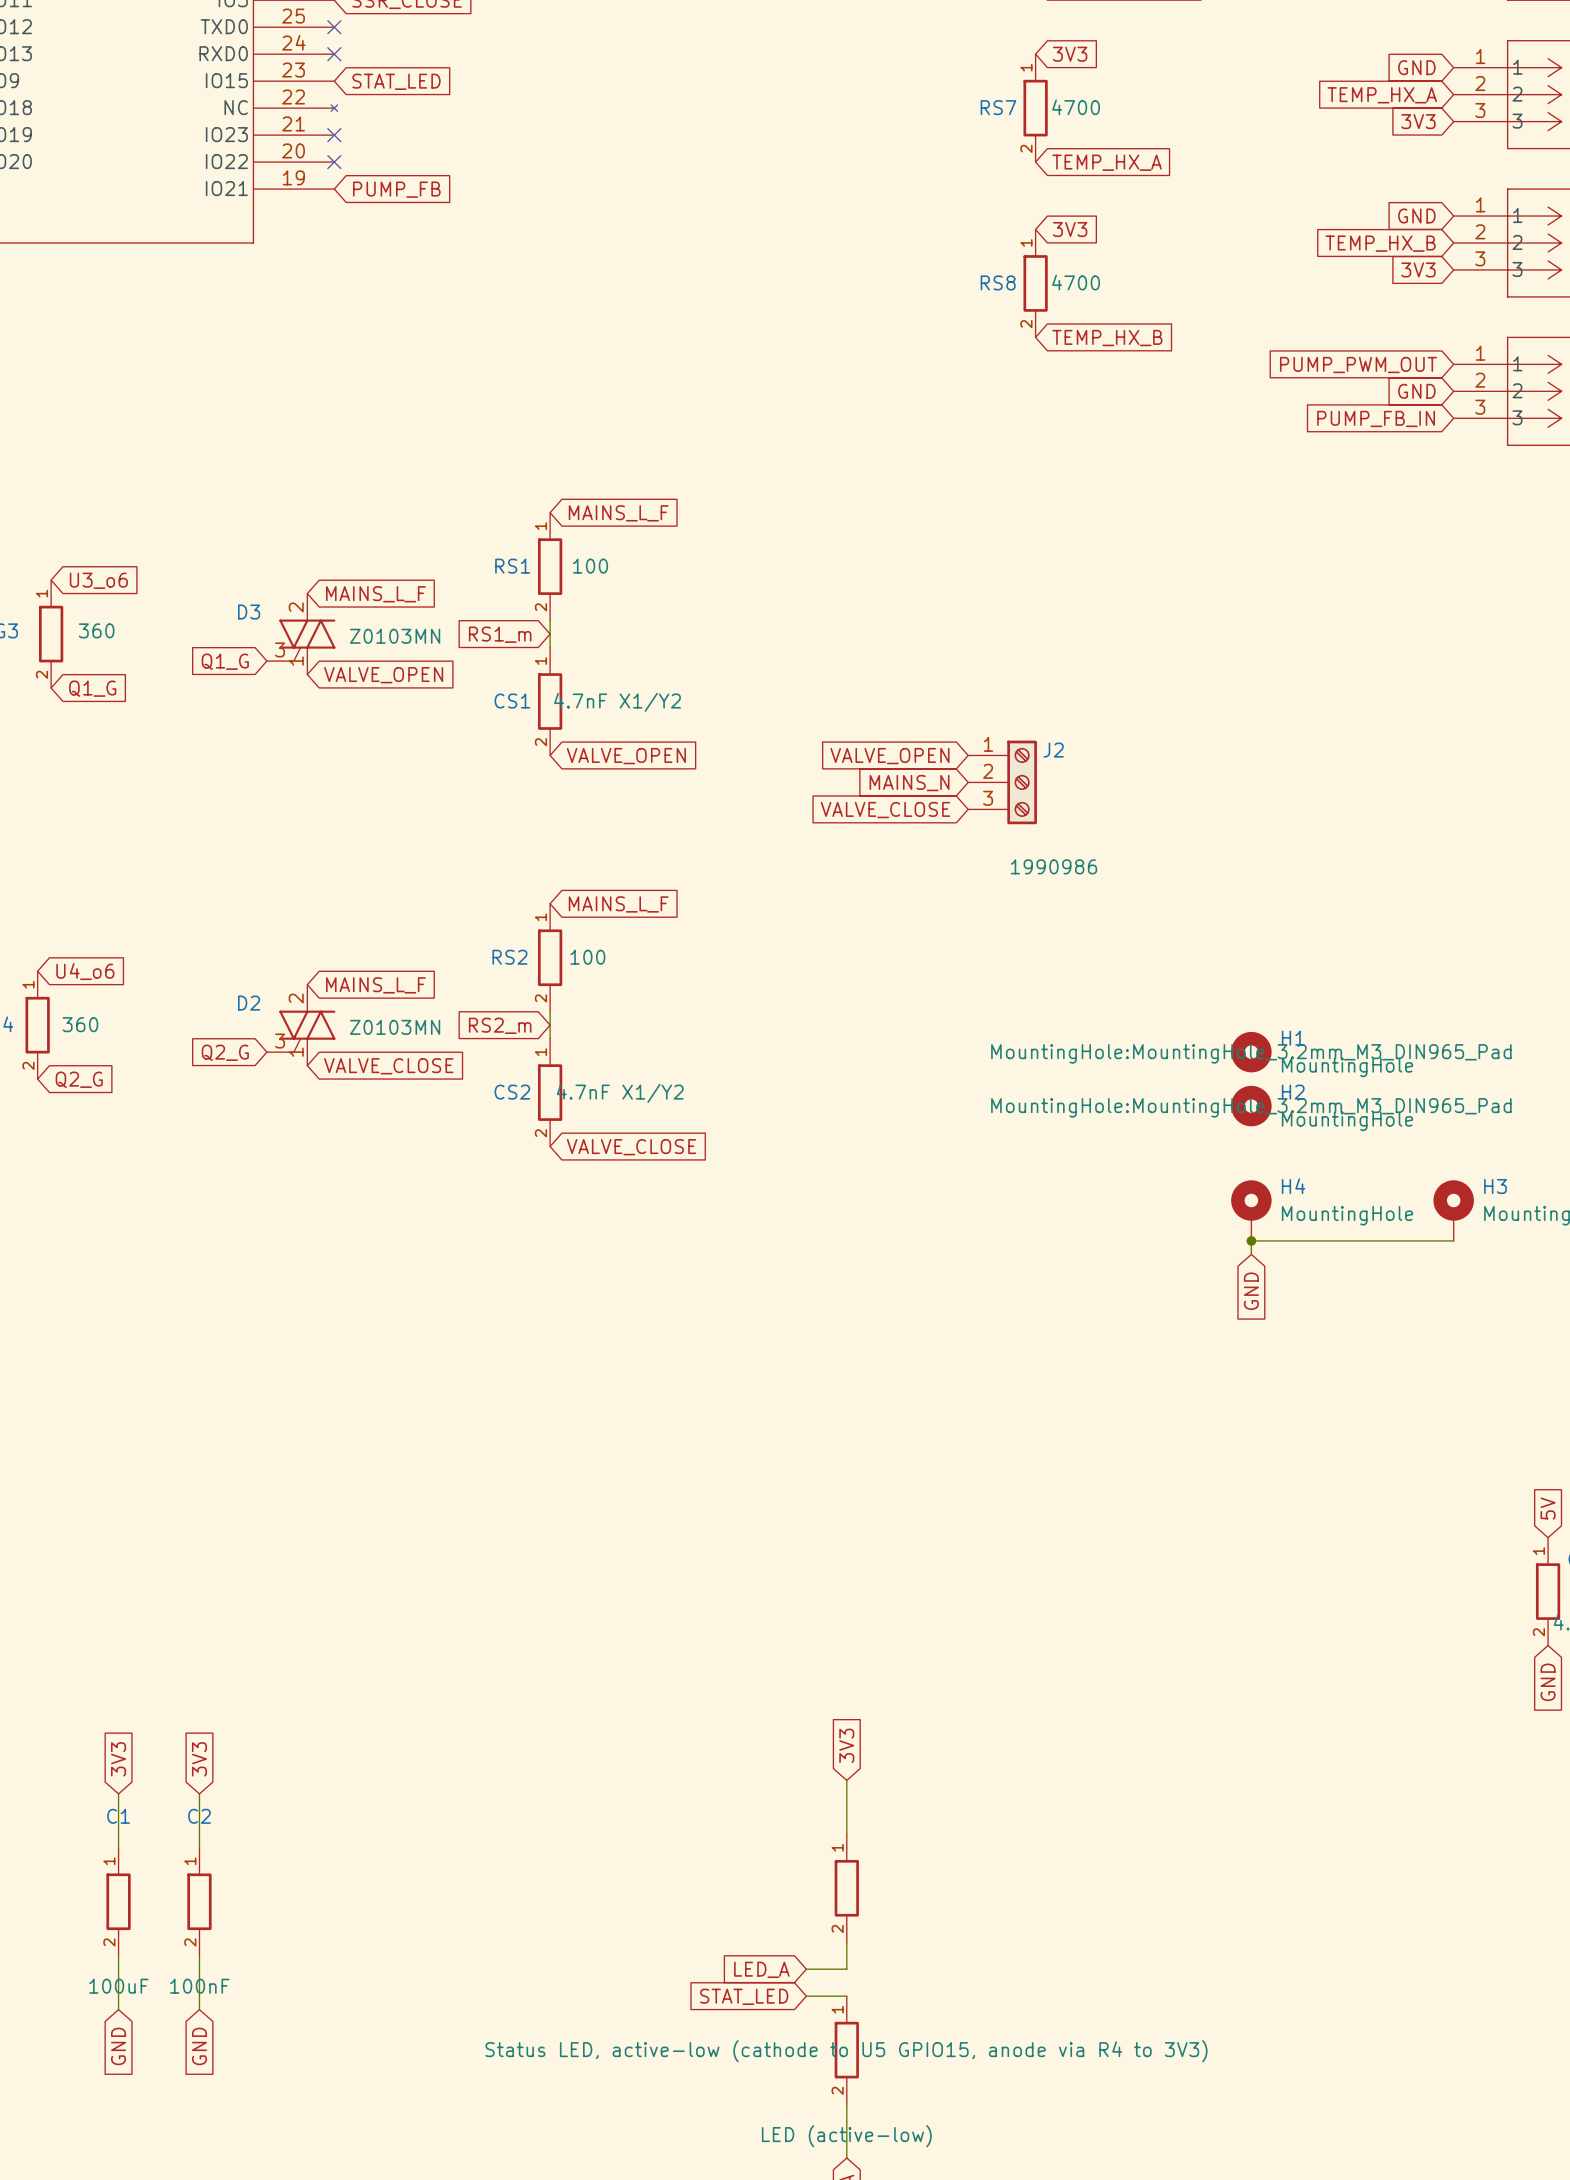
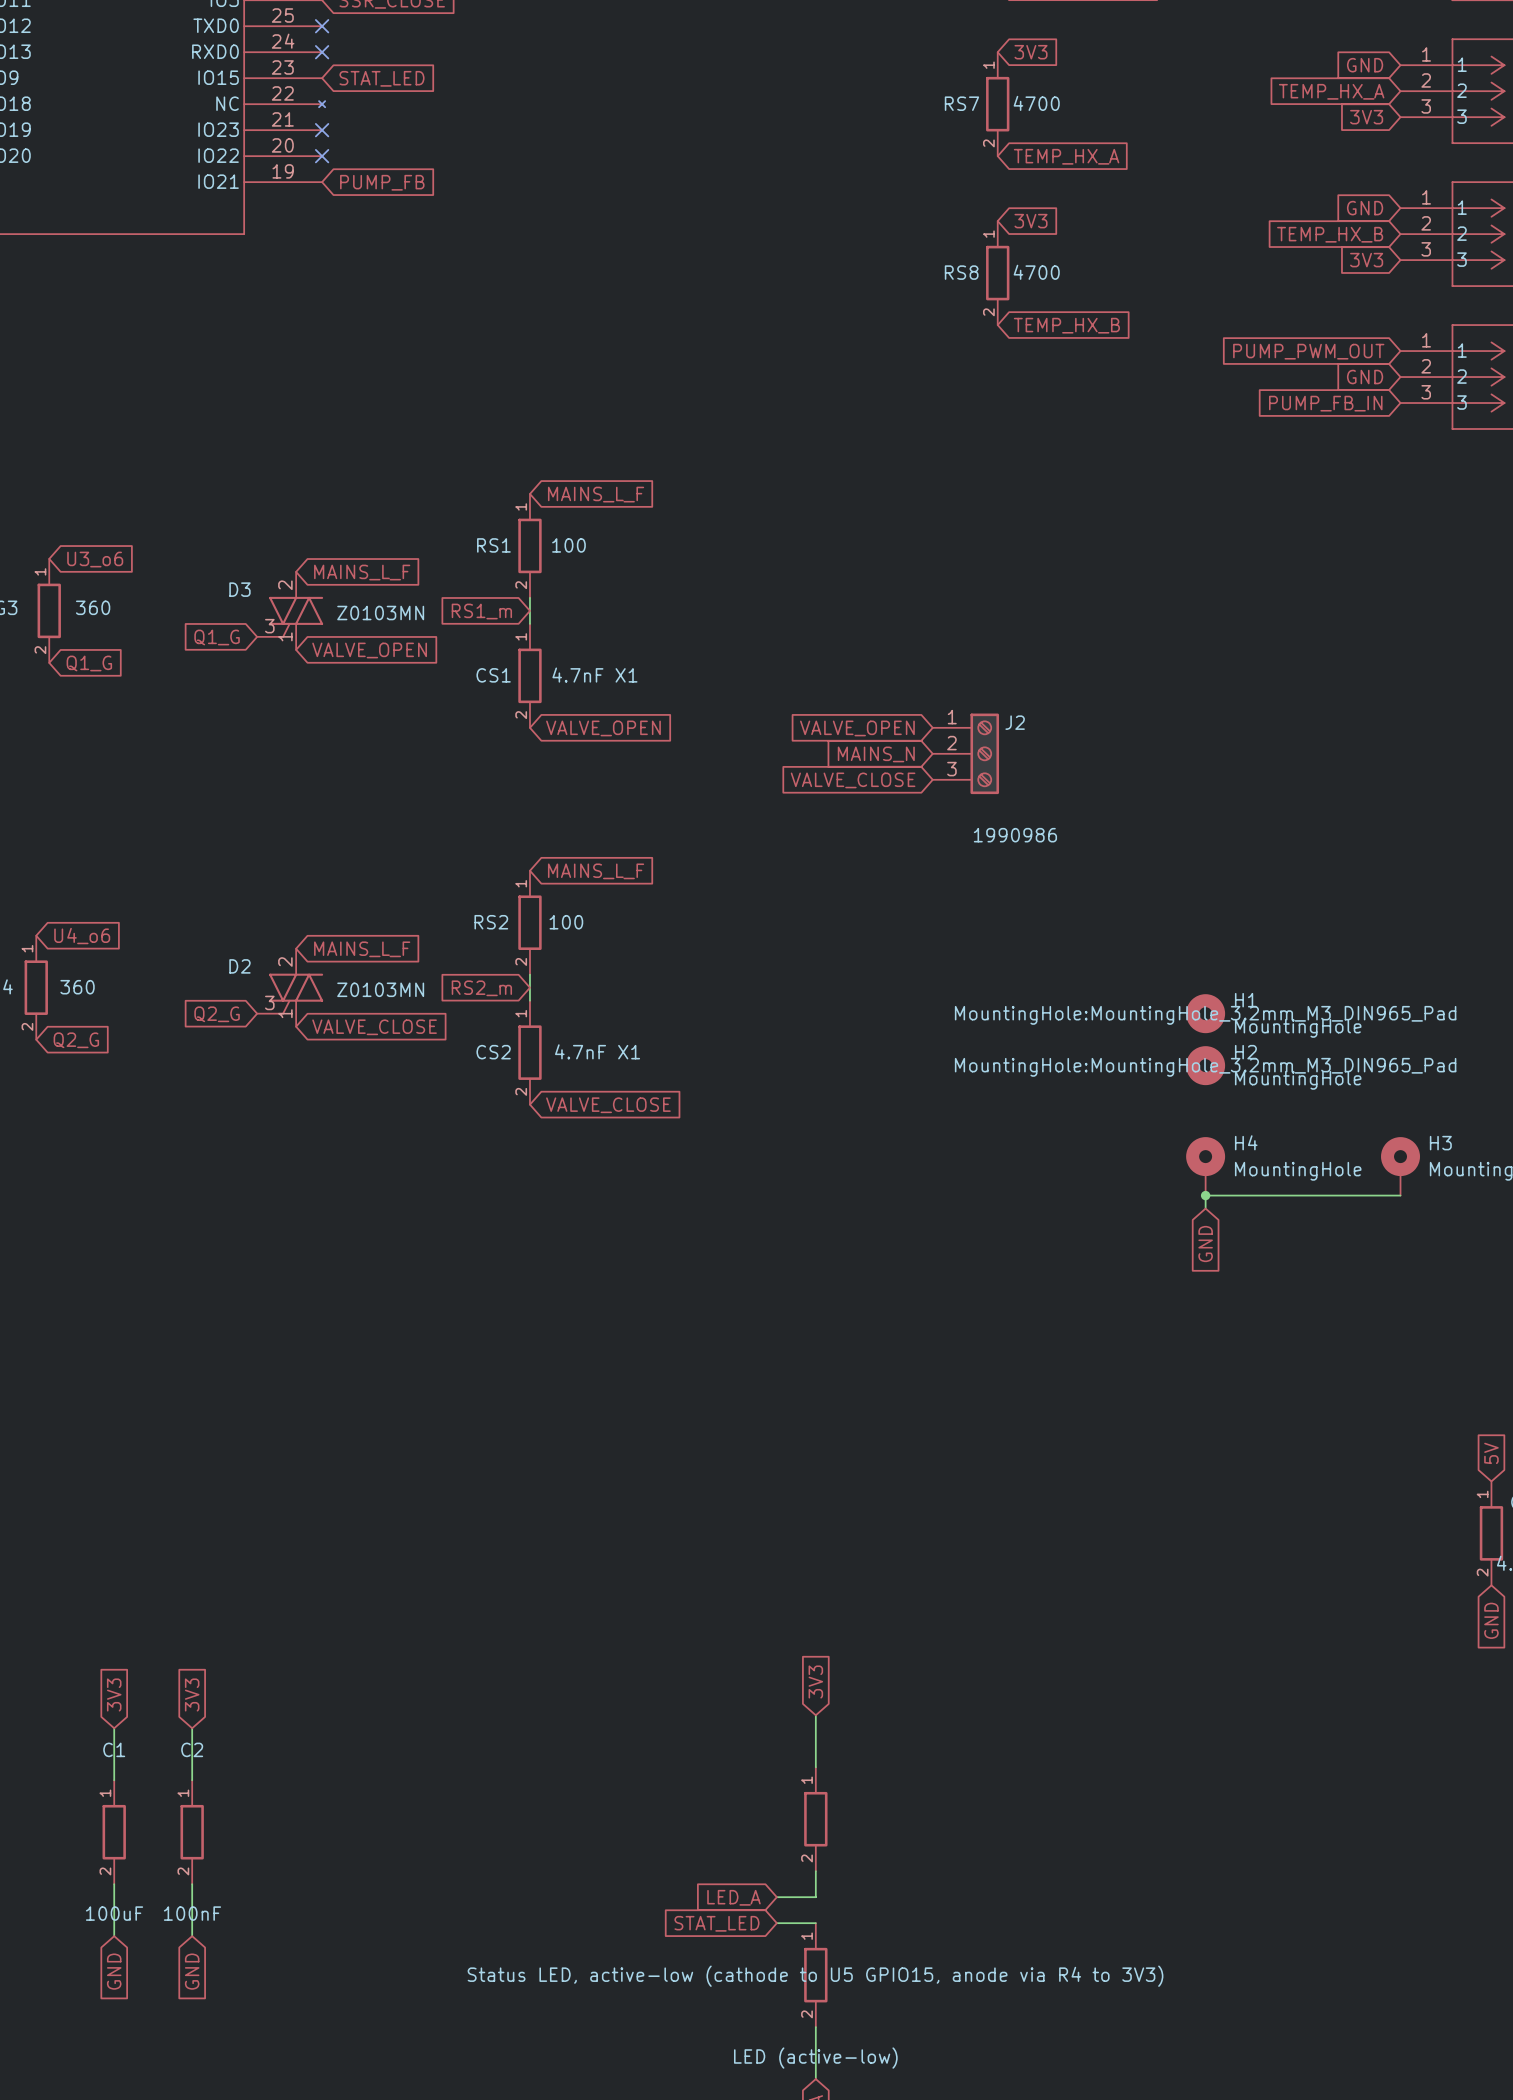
CS1 value: 4.7nF X1/Y2 (617, 702) -> 4.7nF X1 (594, 675)
CS2 value: 4.7nF X1/Y2 (620, 1093) -> 4.7nF X1 (597, 1051)

